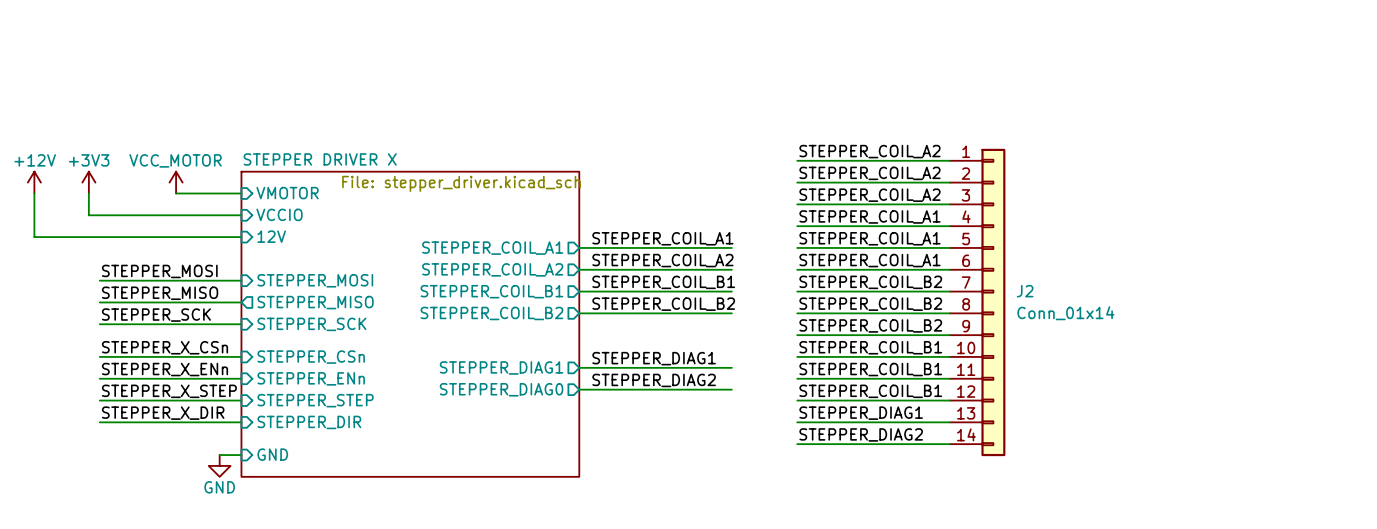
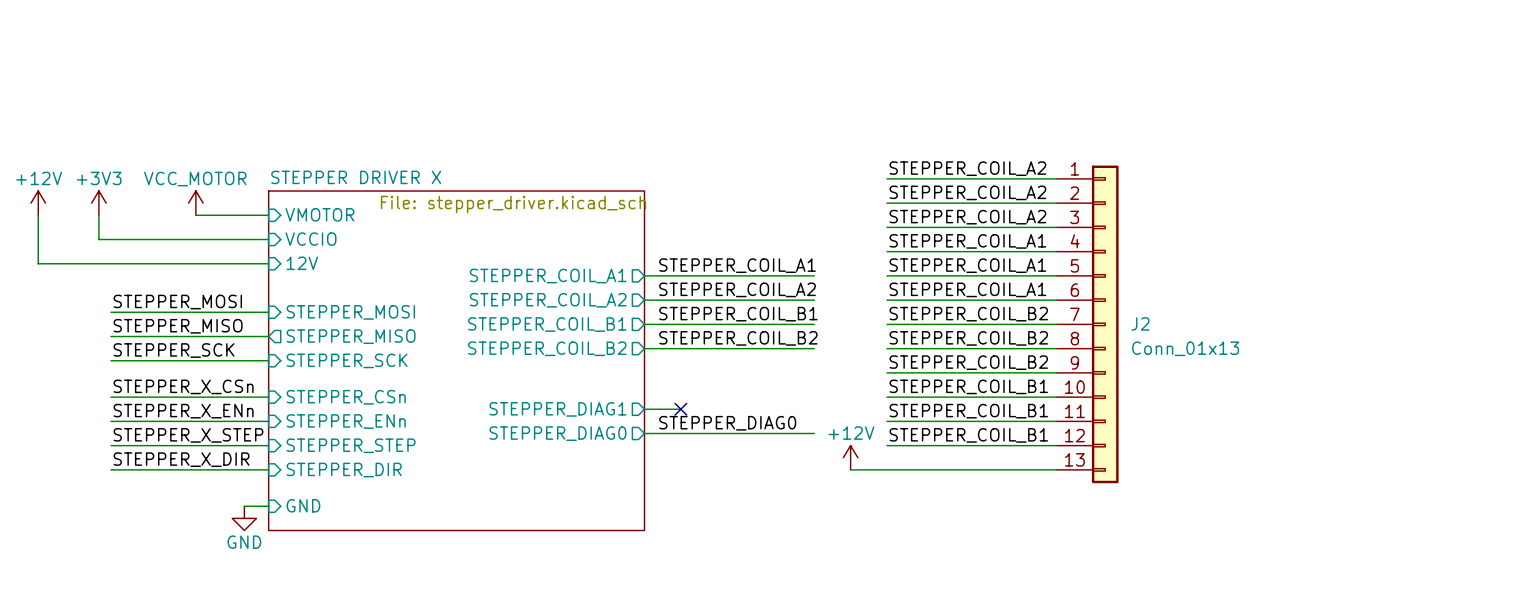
J2 symbol: [949, 148, 1006, 457] -> [1056, 165, 1119, 484]
J2 value: Conn_01x14 (1065, 313) -> Conn_01x13 (1185, 348)
label: STEPPER_DIAG1 (654, 358) -> none
wire: (611, 367) (731, 367) -> none
no-connect mark: none -> (680, 409)
label: STEPPER_DIAG2 (654, 380) -> STEPPER_DIAG0 (727, 423)
power symbol: none -> +12V (850, 457)
label: STEPPER_DIAG1 (861, 413) -> none
wire: none -> (850, 469) (886, 469)
label: STEPPER_DIAG2 (861, 434) -> none
wire: (797, 444) (949, 444) -> none

